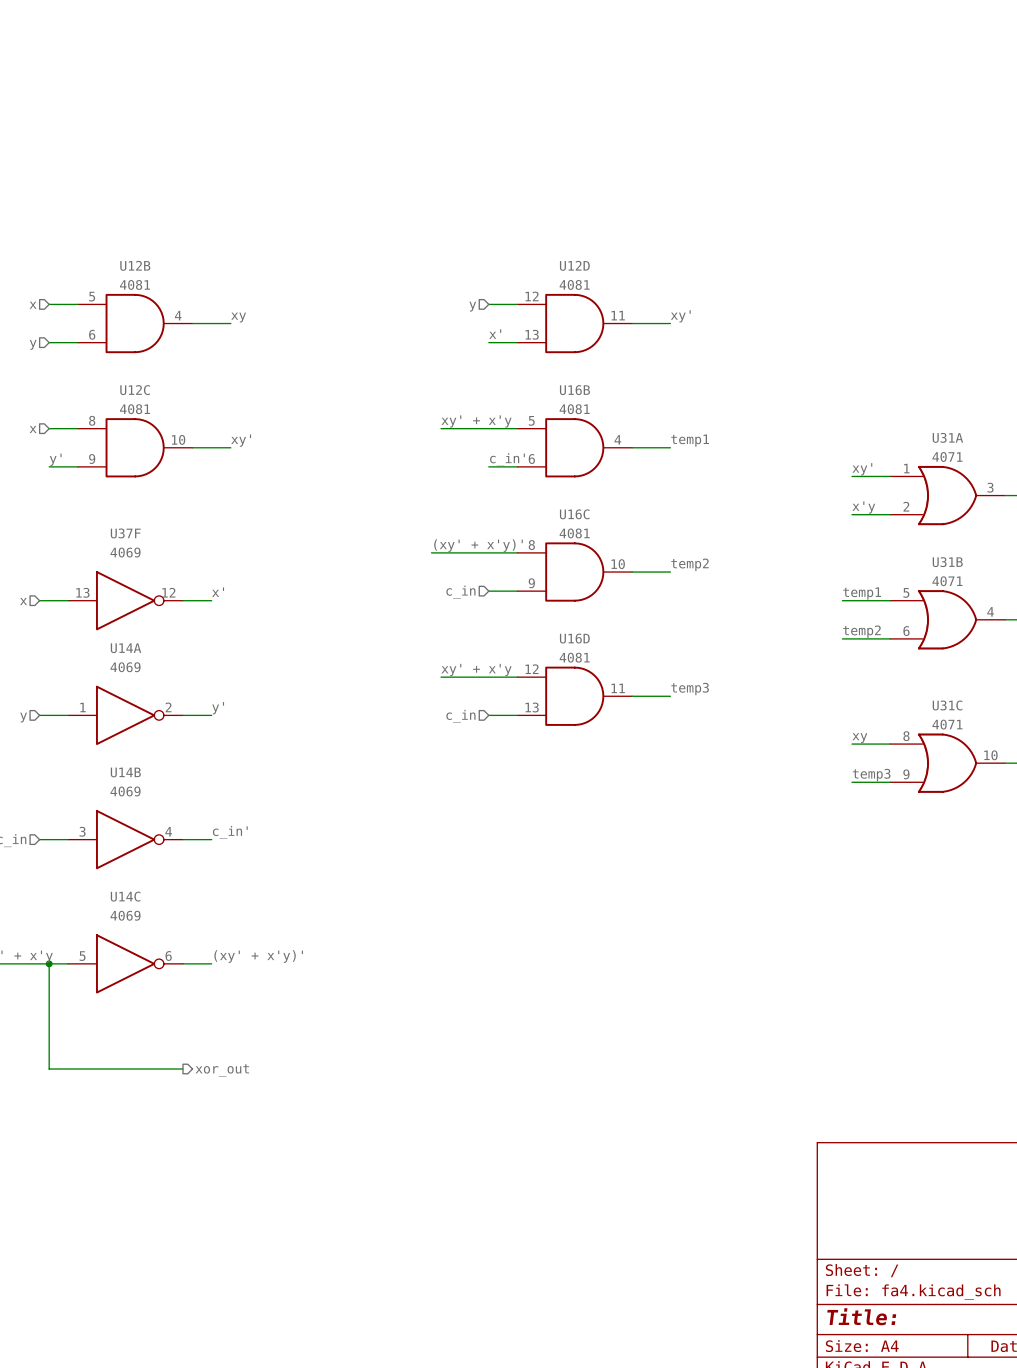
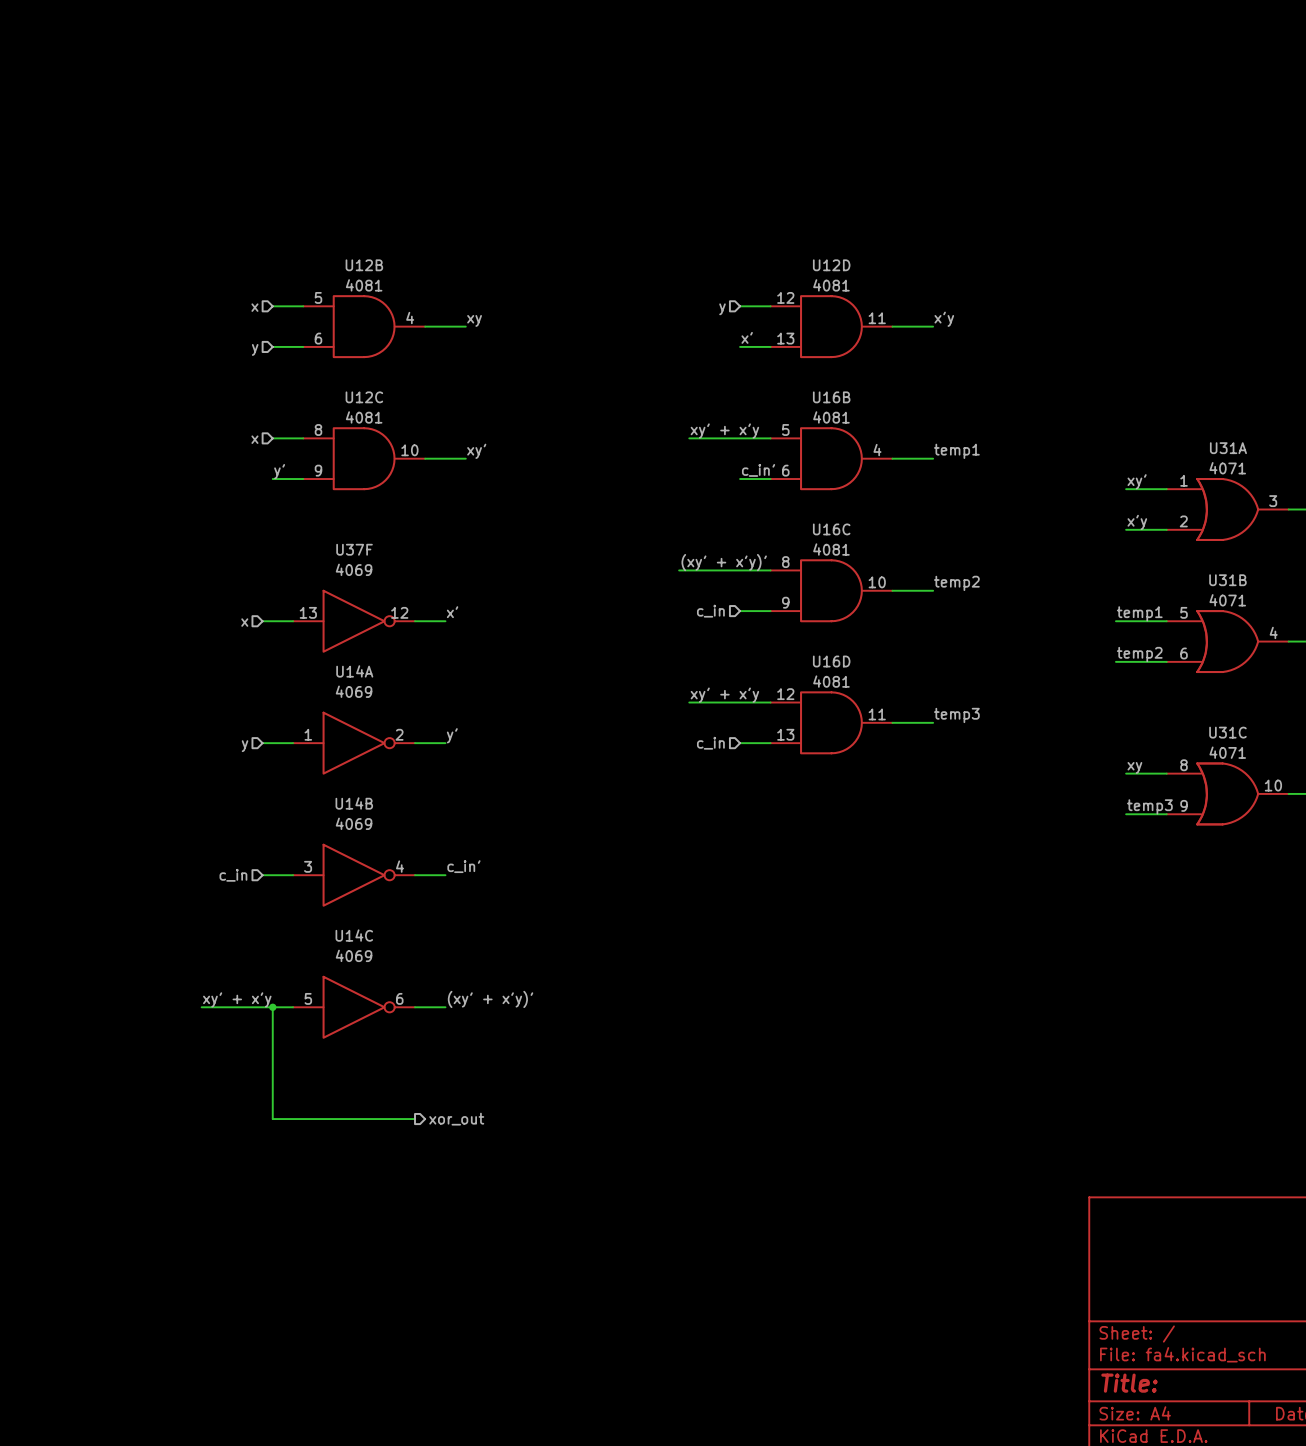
label: xy' (680, 316) -> x'y (944, 319)

